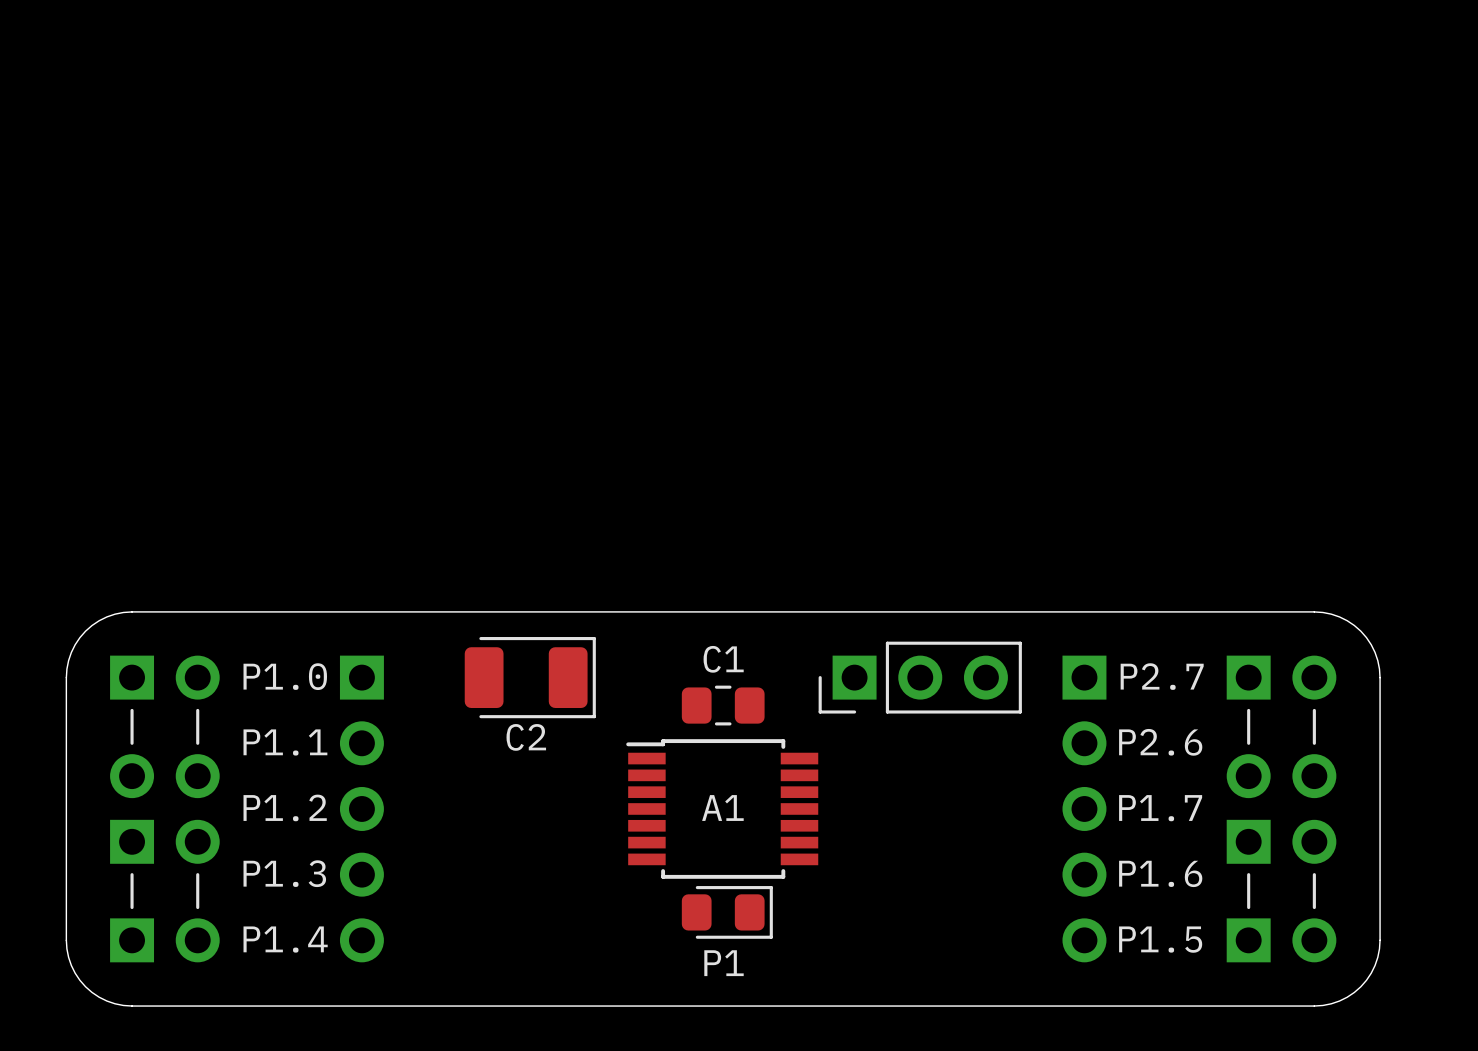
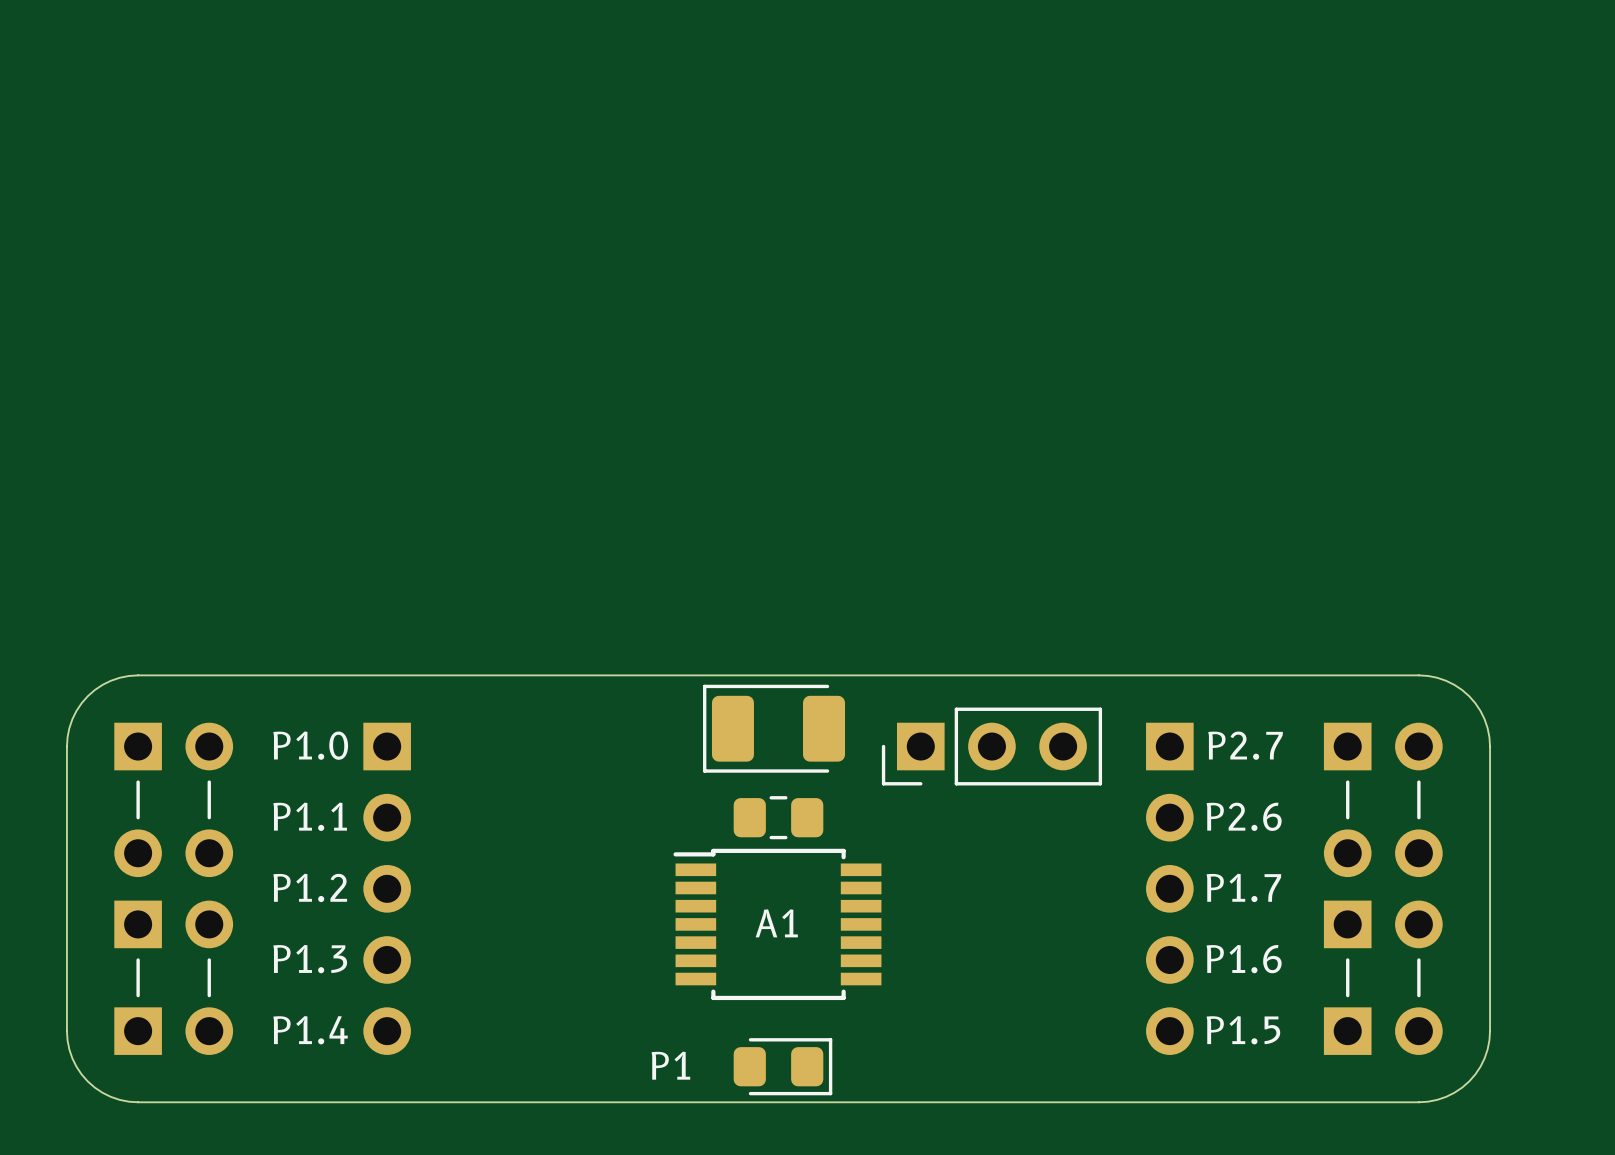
part: none -> (774, 728)
C2: (530, 677) -> none
C1: (723, 705) -> none
part: none -> (778, 817)
A1 position: (722, 808) -> (777, 924)
P1 position: (727, 912) -> (782, 1066)
P1 name position: P1 (724, 963) -> P1 (670, 1065)

